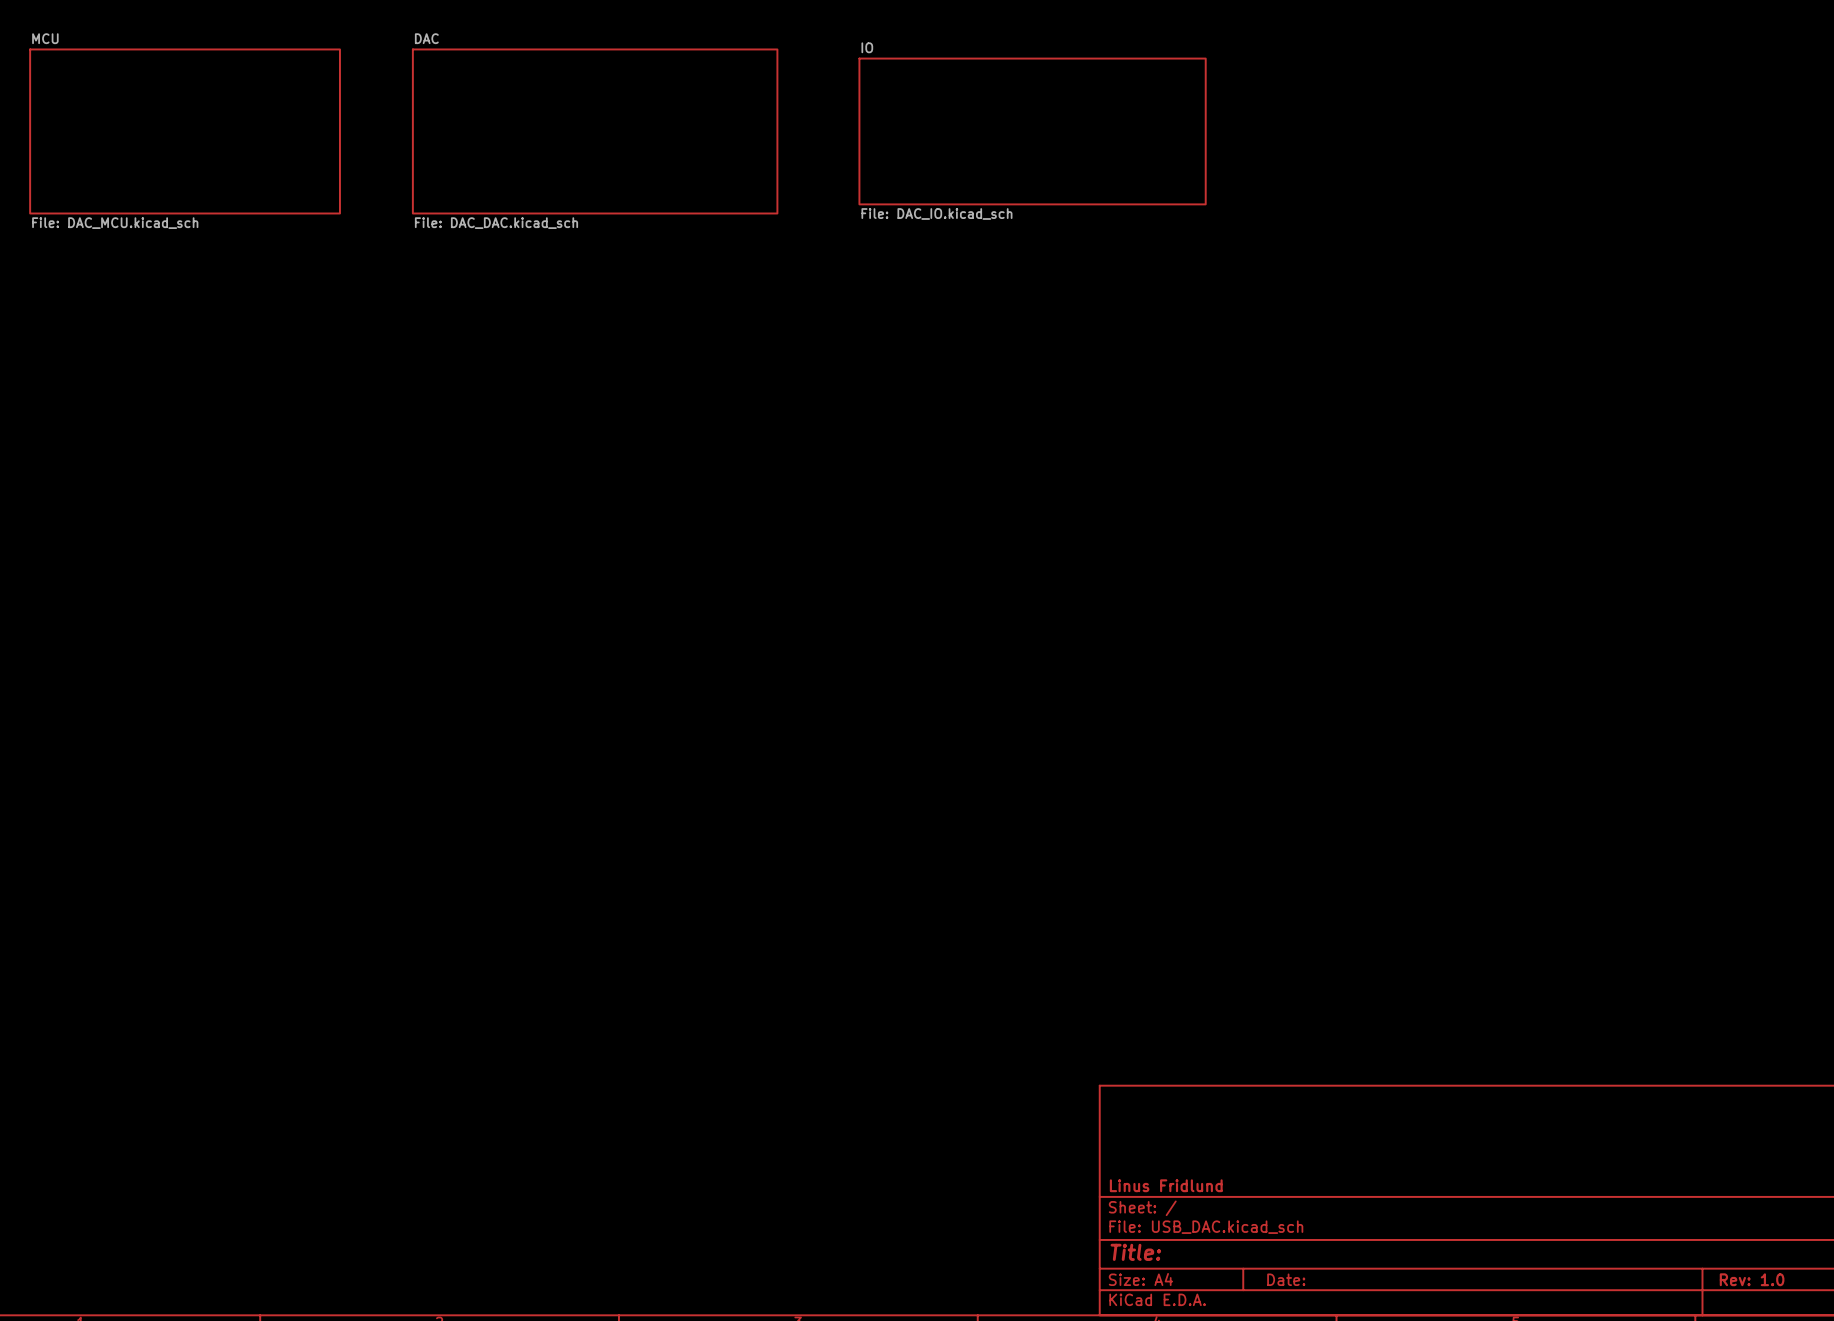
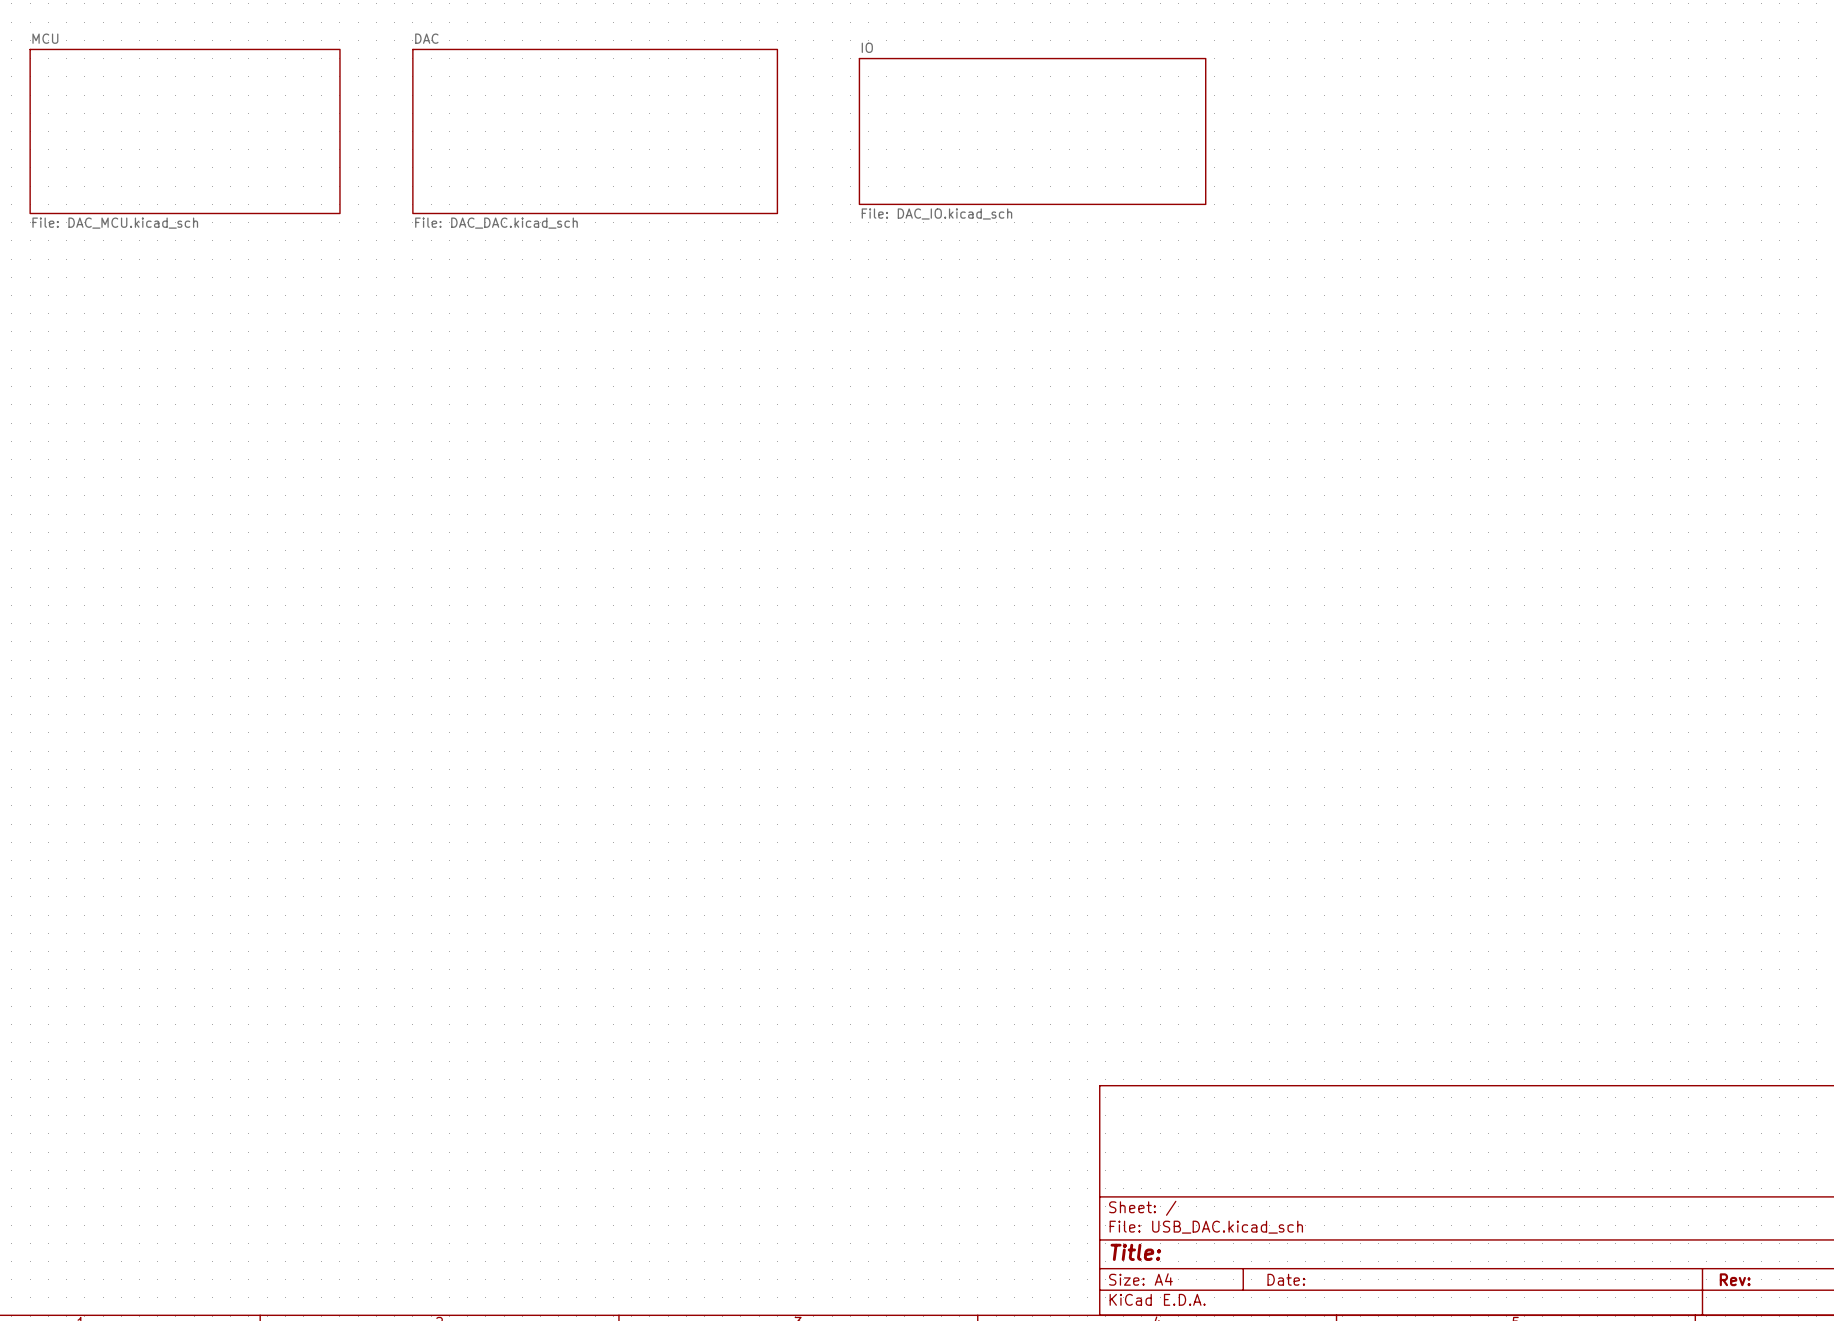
title block: Linus Fridlund (1166, 1185) -> none
title block: Rev: 1.0 (1752, 1279) -> Rev: (1735, 1279)

